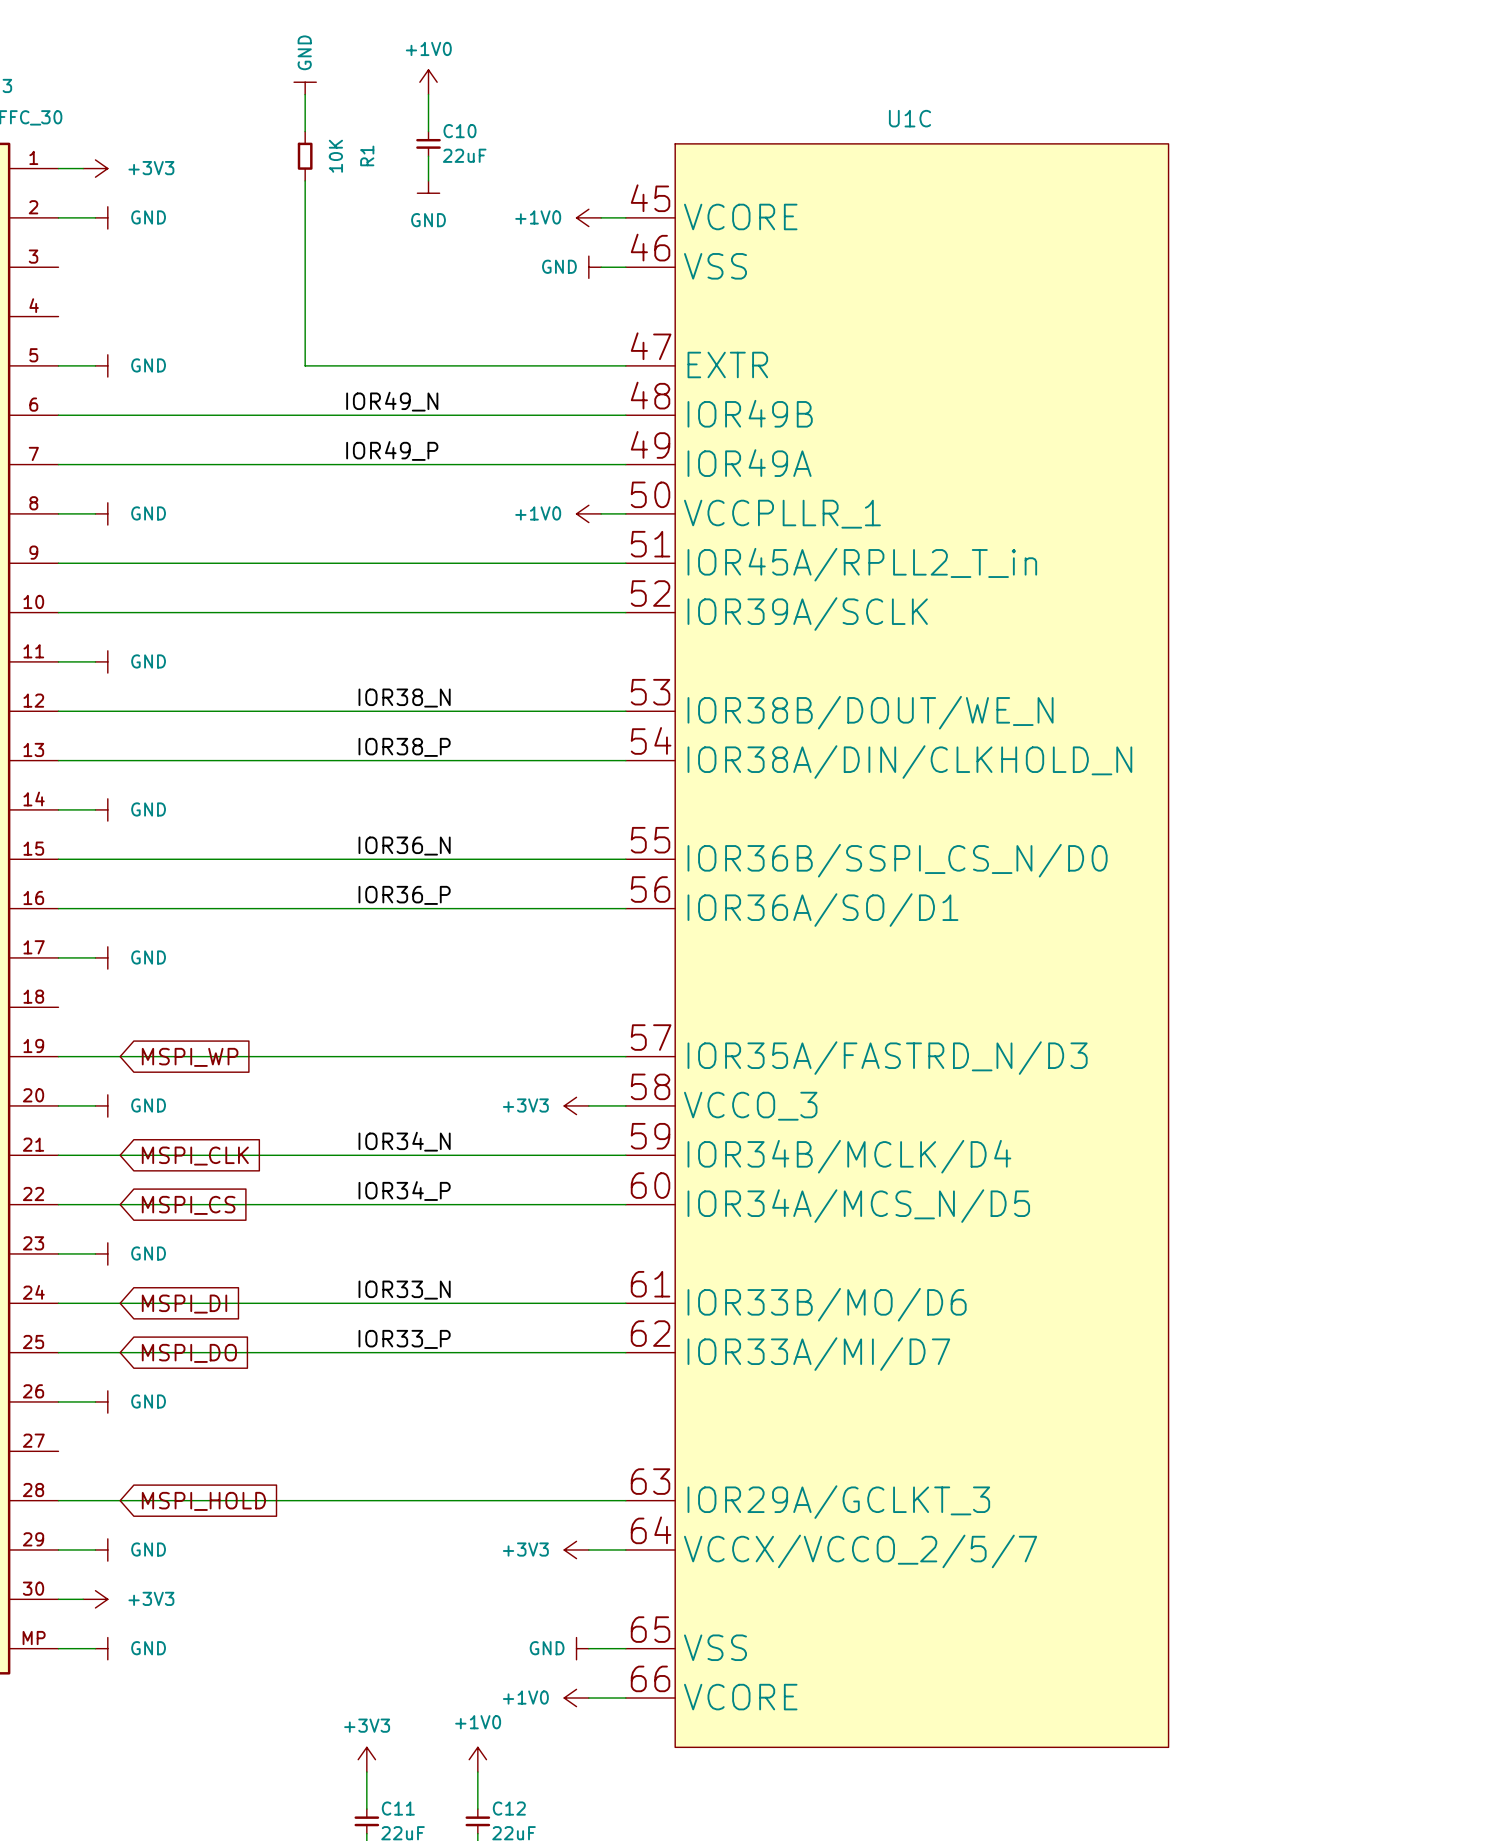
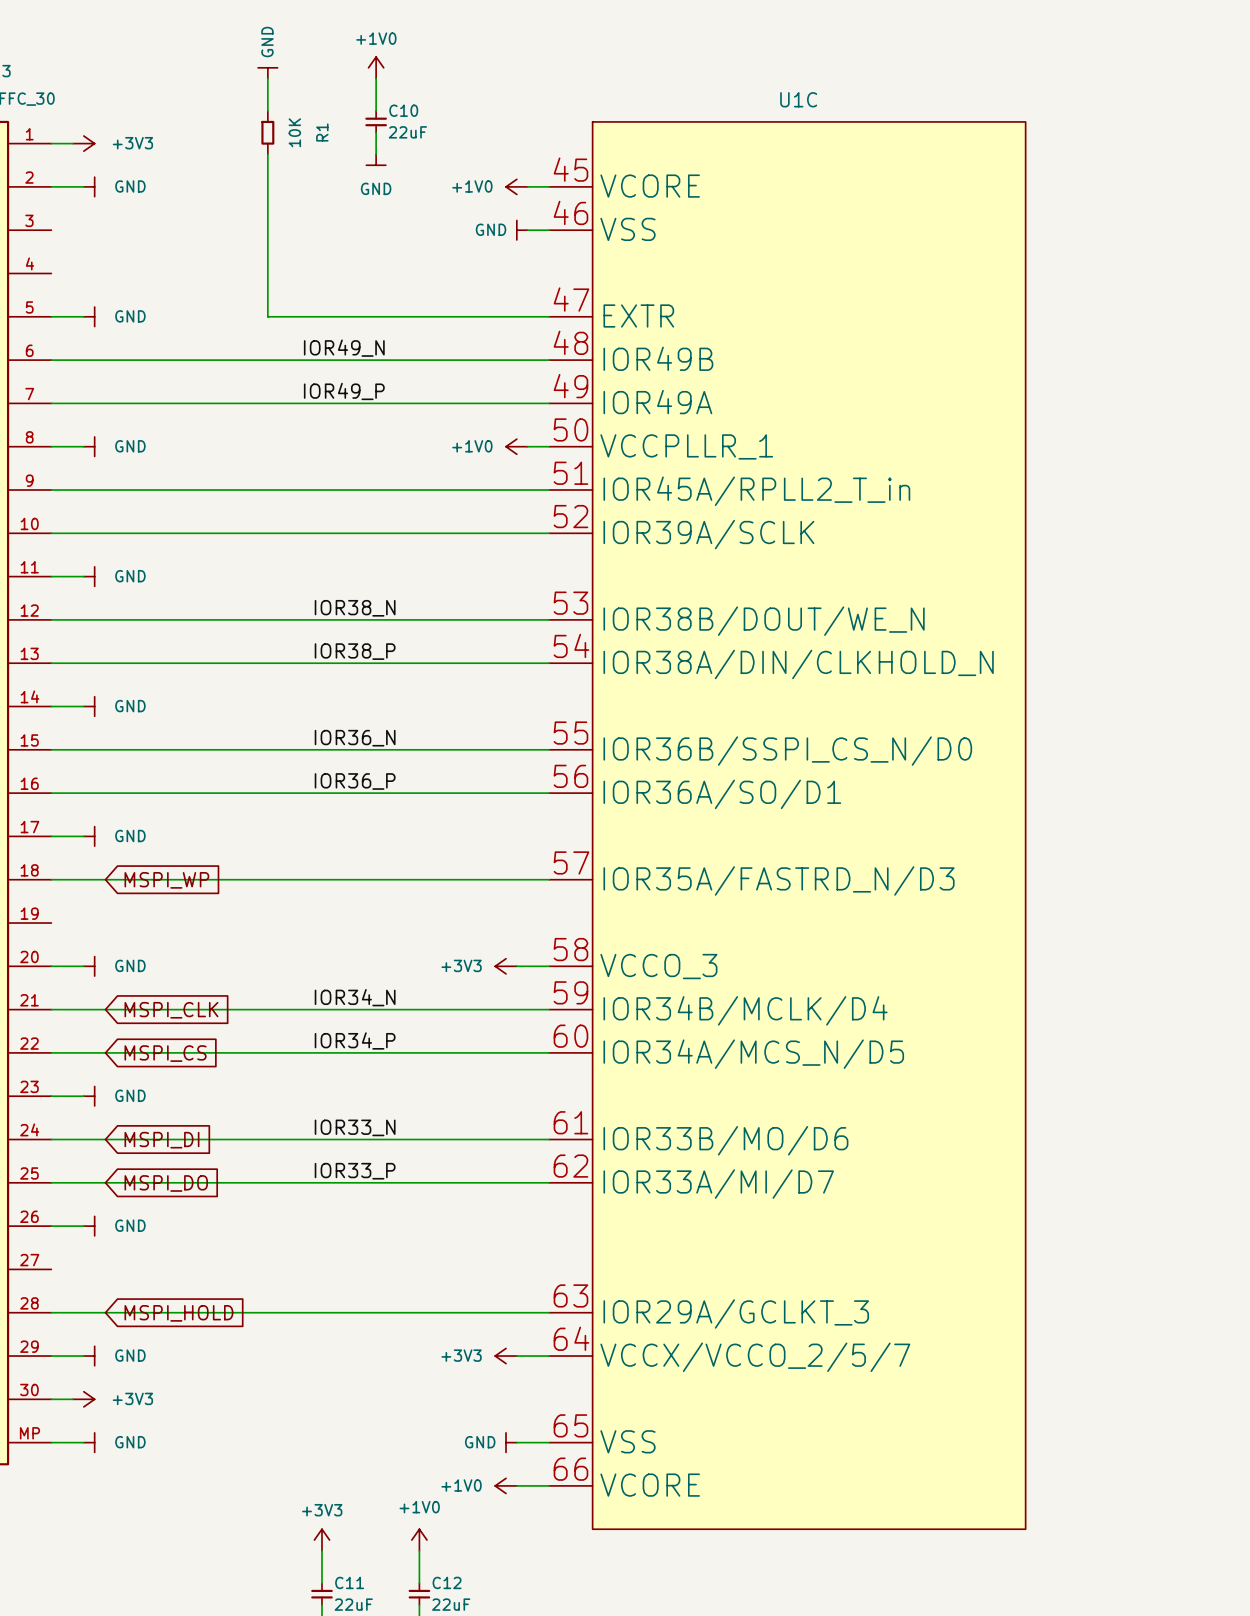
U1C symbol: [625, 143, 1169, 1748] -> [549, 121, 1026, 1530]
wire: (58, 1056) (625, 1056) -> (51, 879) (549, 879)
global label position: MSPI_WP (190, 1057) -> MSPI_WP (166, 880)

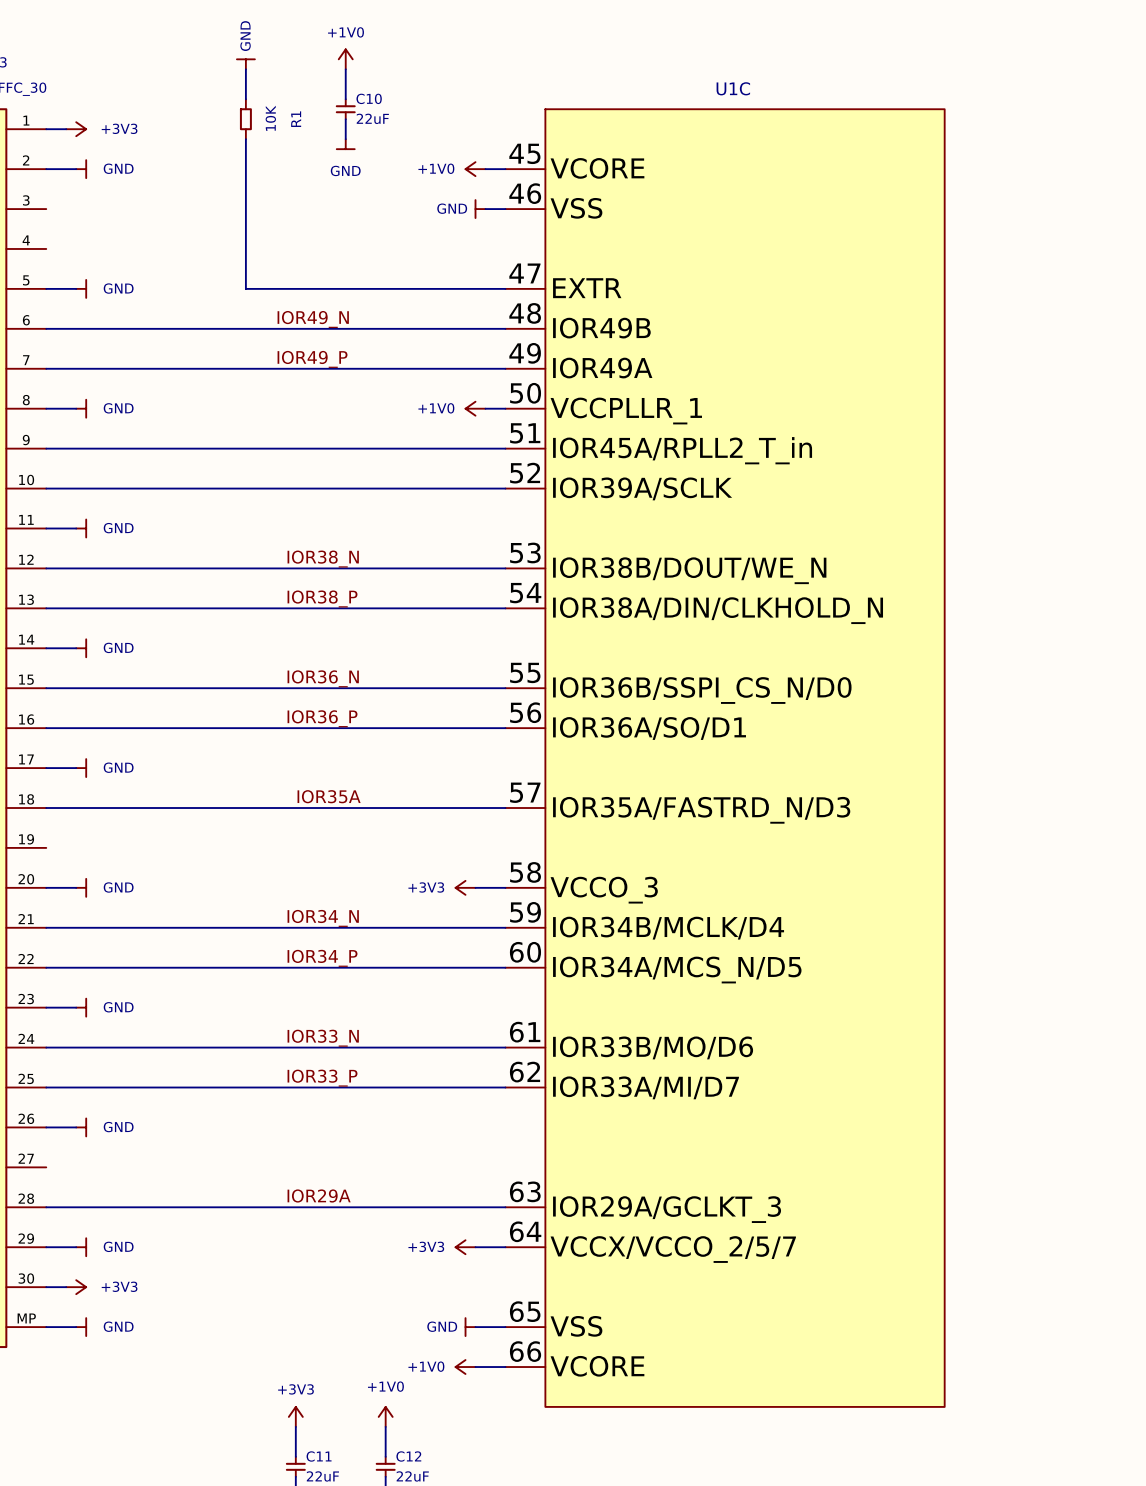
label: none -> IOR35A (329, 796)
global label: MSPI_WP (166, 880) -> none
global label: MSPI_CLK (171, 1010) -> none
global label: MSPI_CS (165, 1053) -> none
global label: MSPI_DI (161, 1140) -> none
global label: MSPI_DO (166, 1183) -> none
label: none -> IOR29A (319, 1195)
global label: MSPI_HOLD (178, 1313) -> none

